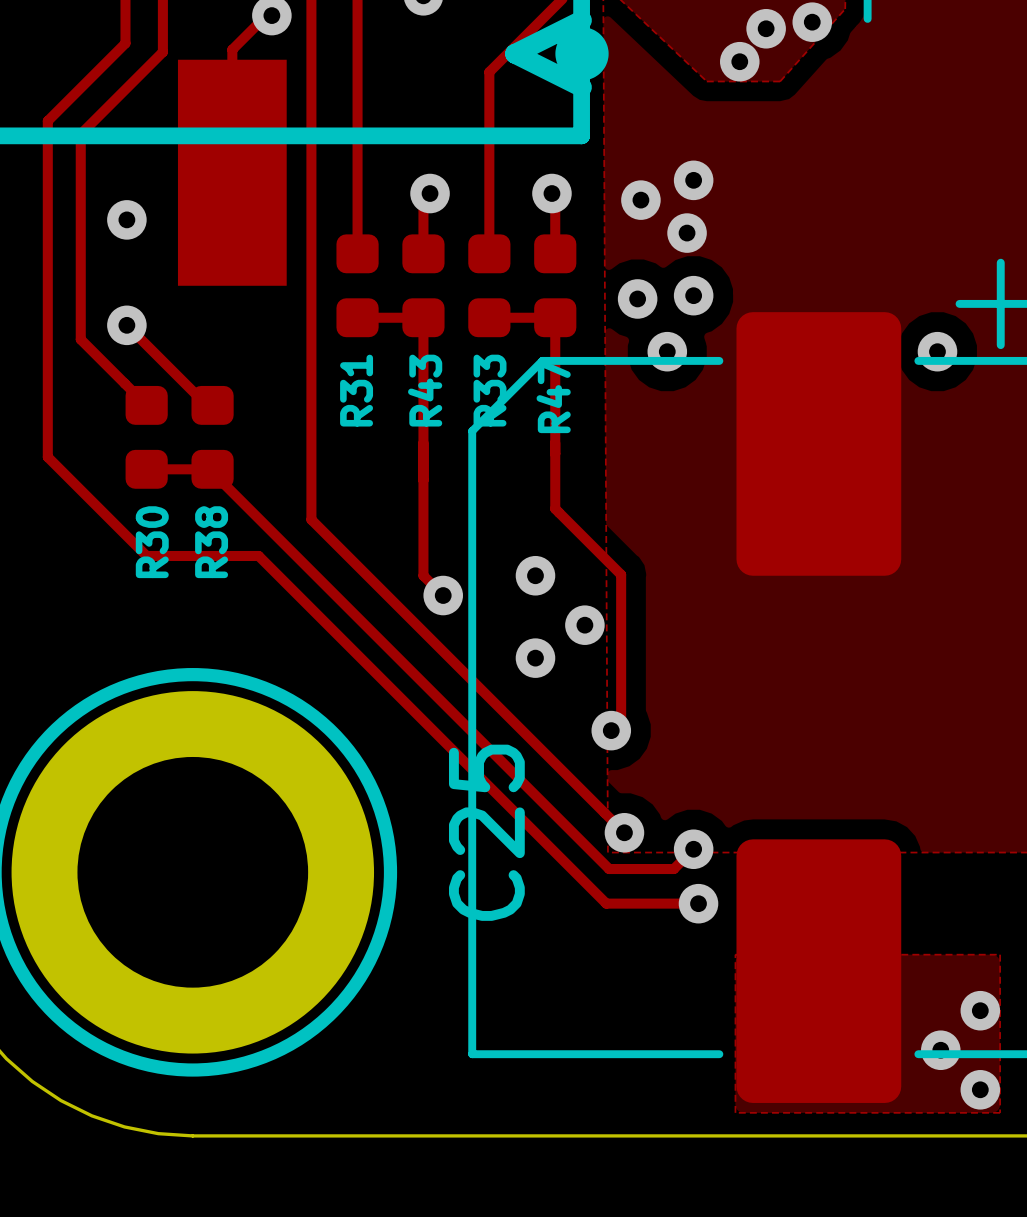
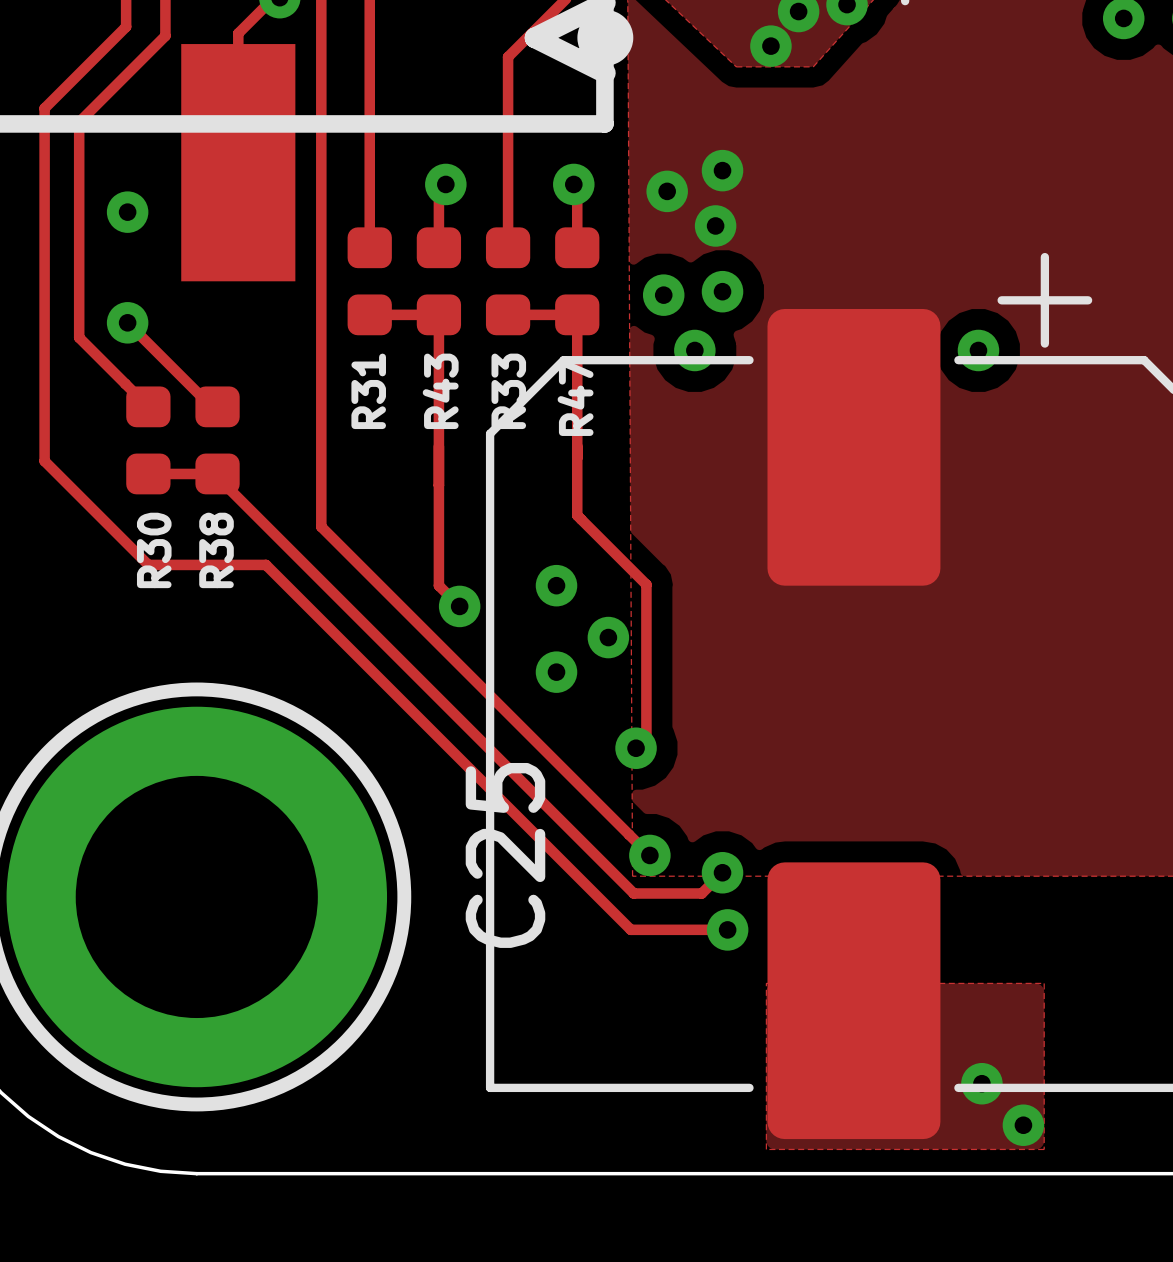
via: (980, 1010) -> none

